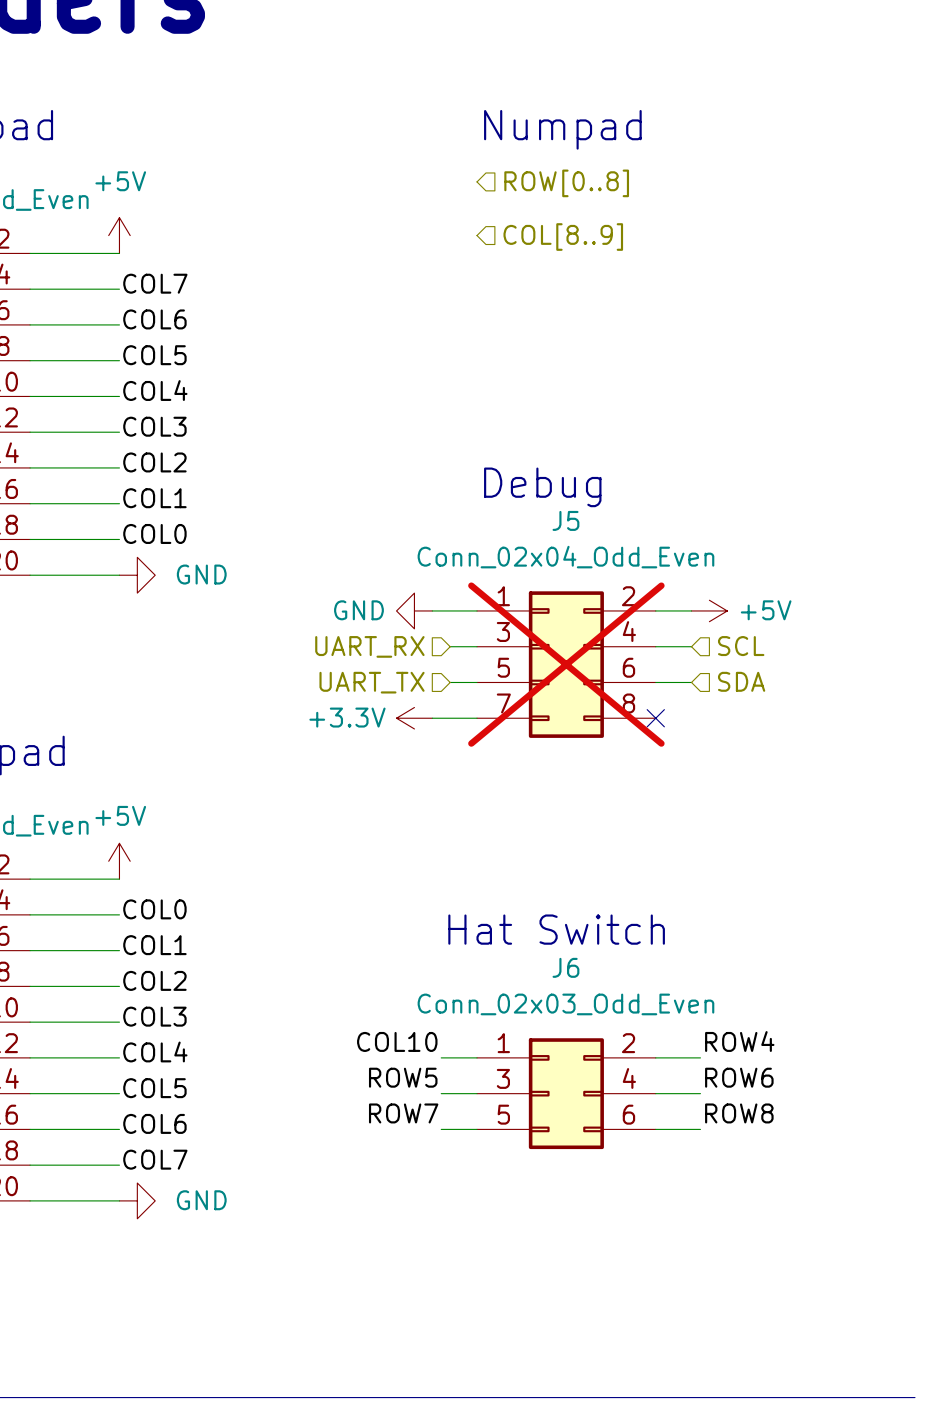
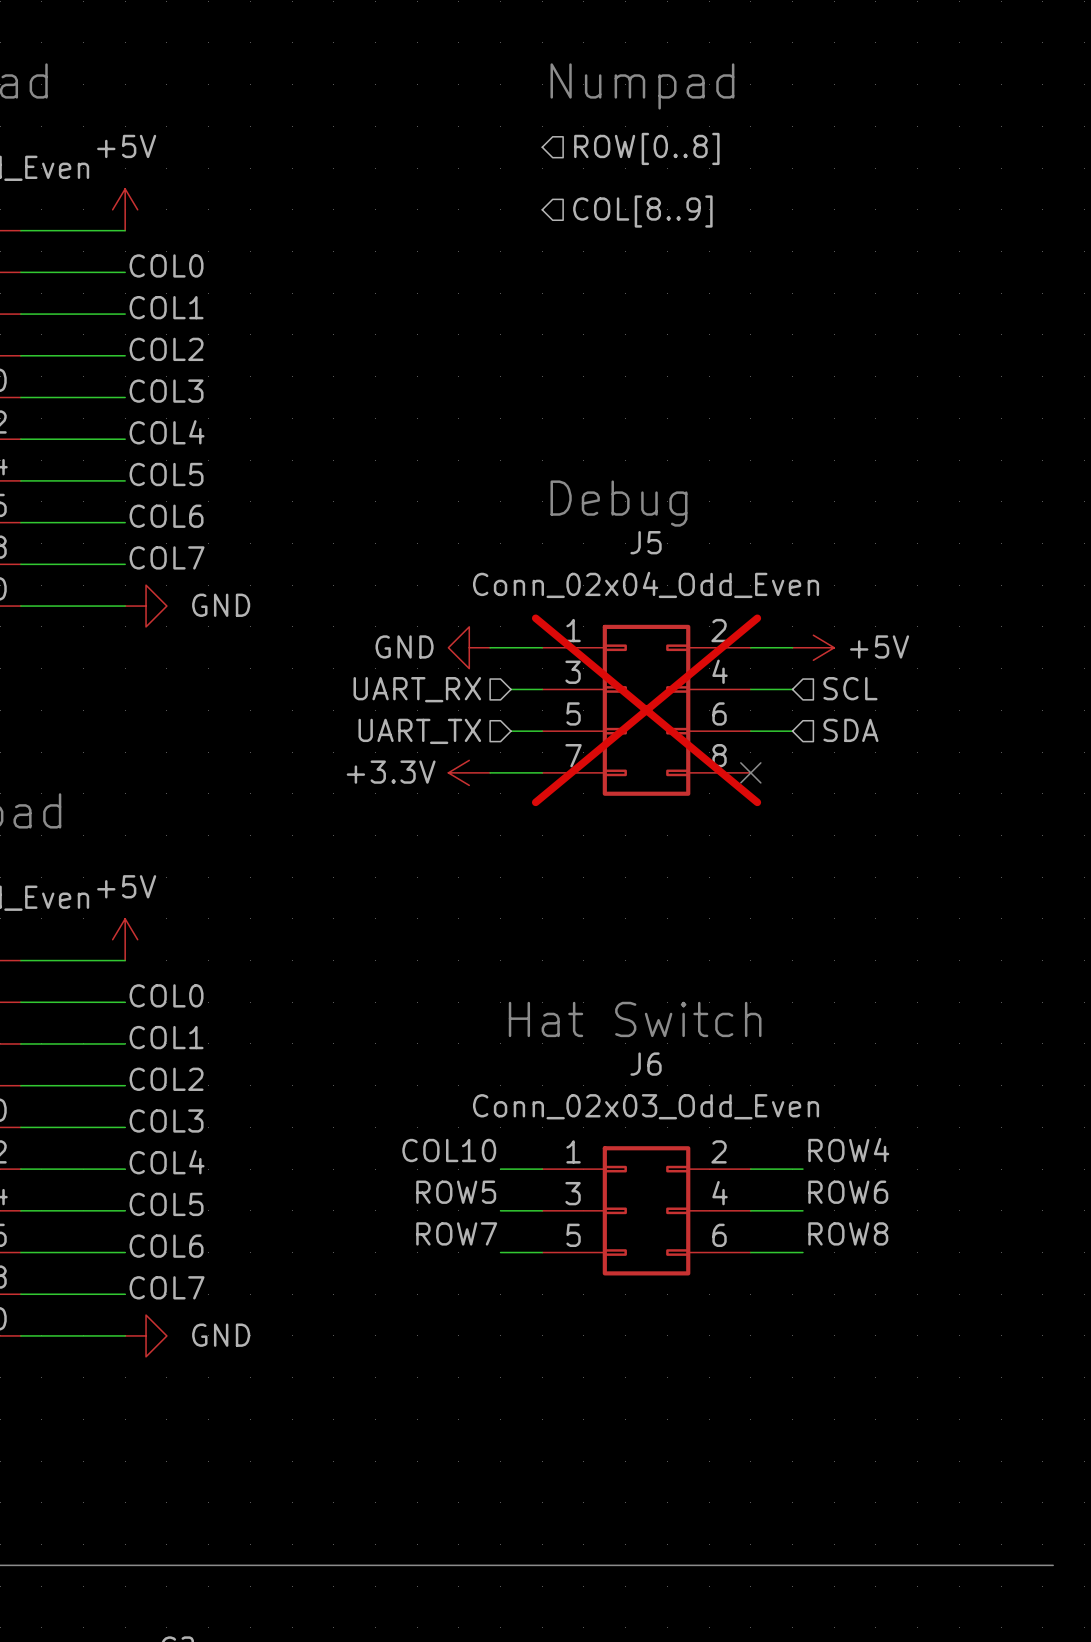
label: COL7 (155, 283) -> COL0 (166, 265)
label: COL6 (154, 319) -> COL1 (166, 307)
label: COL5 (154, 355) -> COL2 (166, 349)
label: COL4 (155, 390) -> COL3 (166, 391)
label: COL3 (154, 426) -> COL4 (167, 432)
label: COL2 (154, 462) -> COL5 (166, 474)
label: COL1 (154, 498) -> COL6 (166, 516)
label: COL0 (154, 533) -> COL7 (167, 557)

